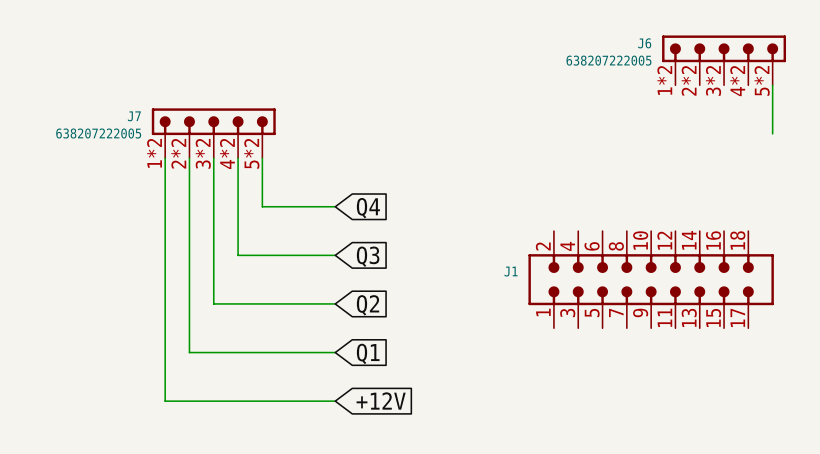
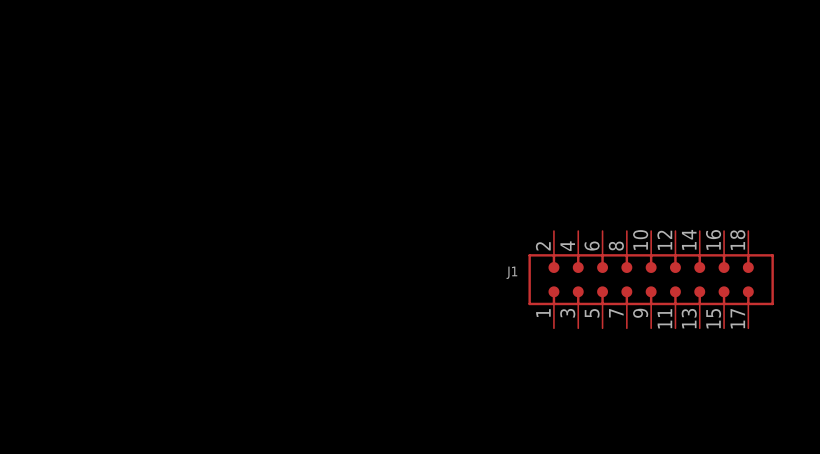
J6: 638207222005 (724, 60) -> none
wire: (772, 85) (772, 133) -> none
J7: 638207222005 (213, 133) -> none
wire: (165, 158) (165, 401) (335, 401) -> none
wire: (189, 158) (189, 352) (335, 352) -> none
wire: (213, 158) (213, 303) (335, 303) -> none
wire: (238, 158) (238, 255) (335, 255) -> none
wire: (262, 158) (262, 206) (335, 206) -> none
global label: Q4 (368, 208) -> none
global label: Q3 (368, 256) -> none
global label: Q2 (368, 305) -> none
global label: Q1 (368, 353) -> none
global label: +12V (381, 401) -> none

